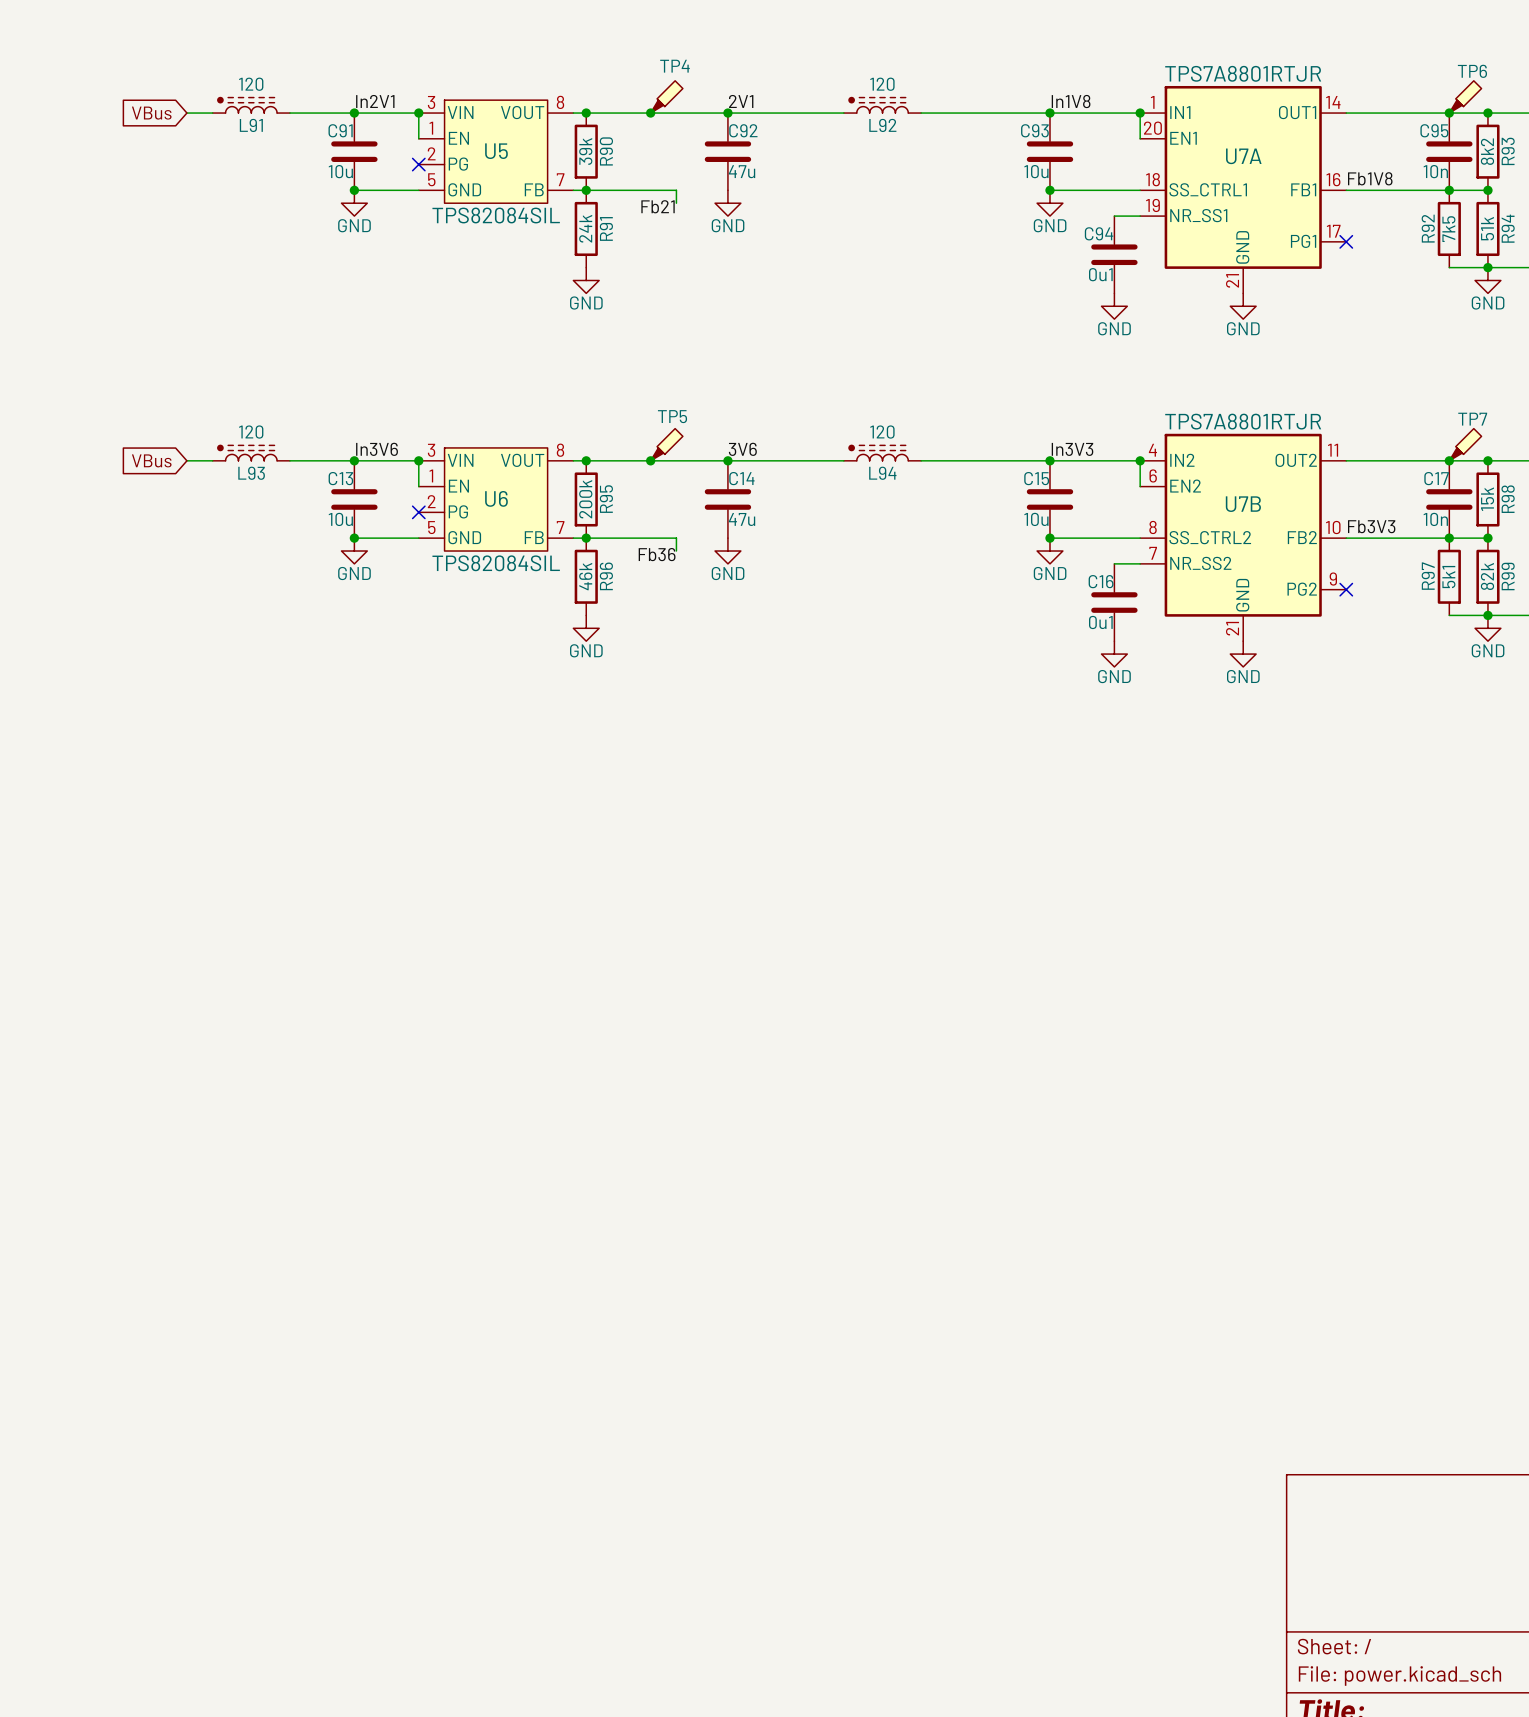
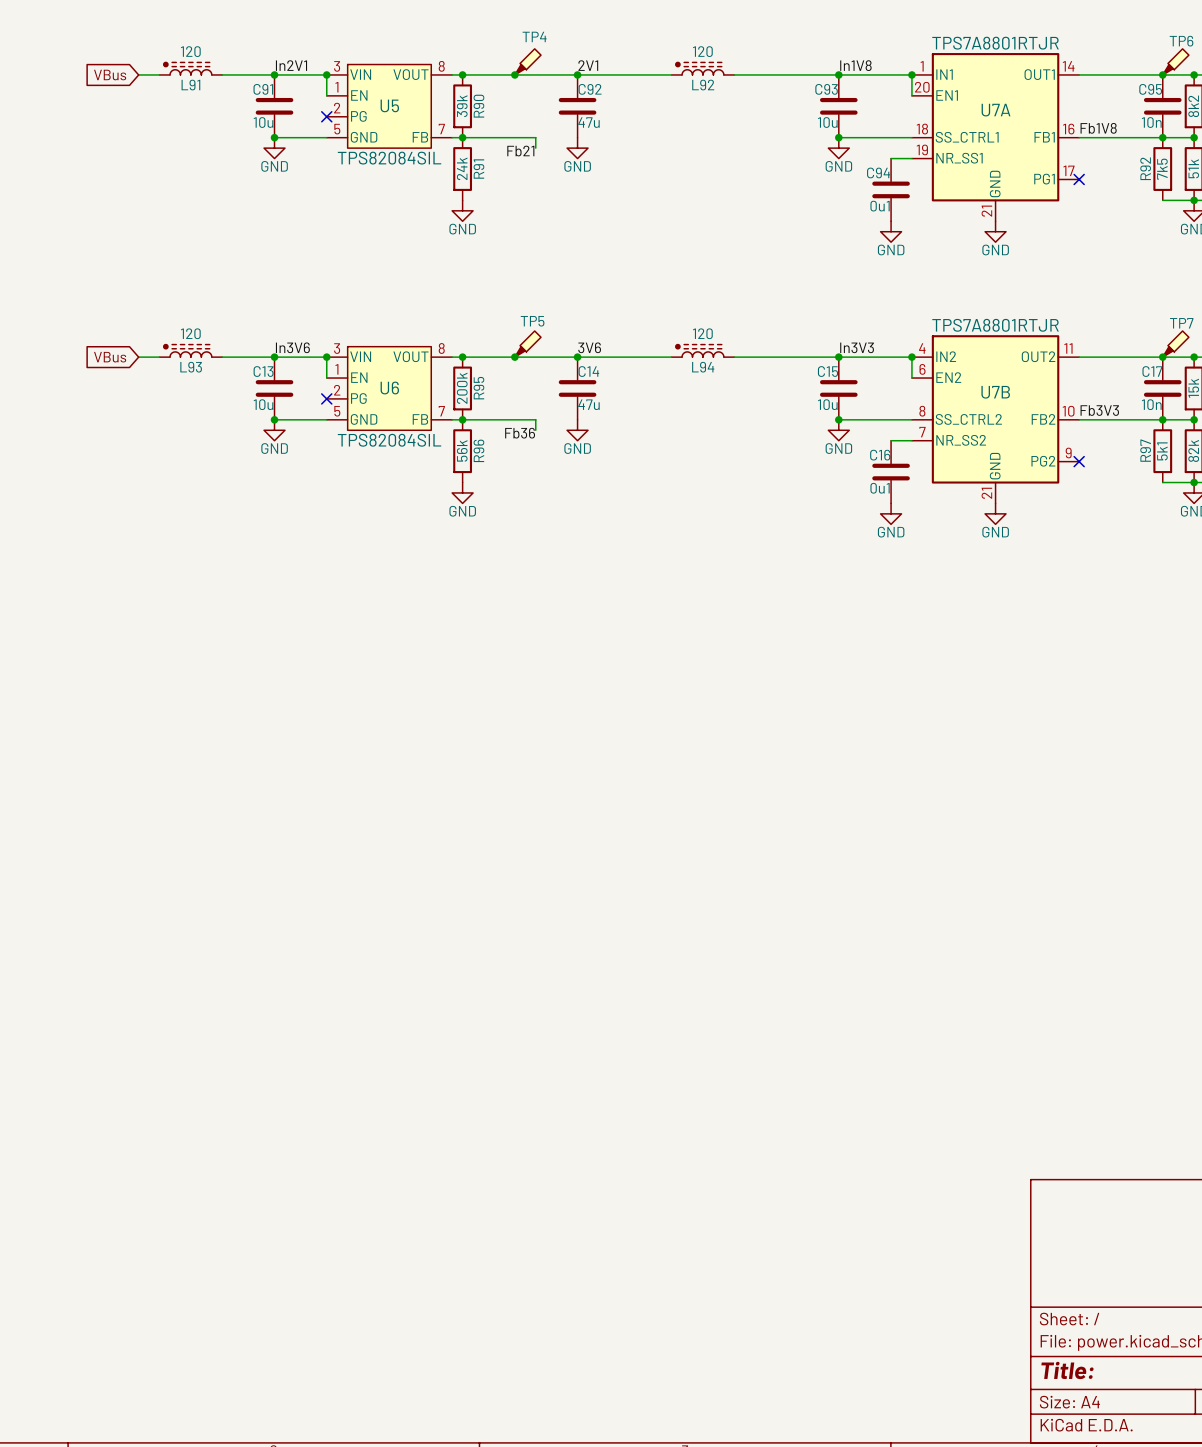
R96 value: 46k (585, 576) -> 56k (462, 450)

